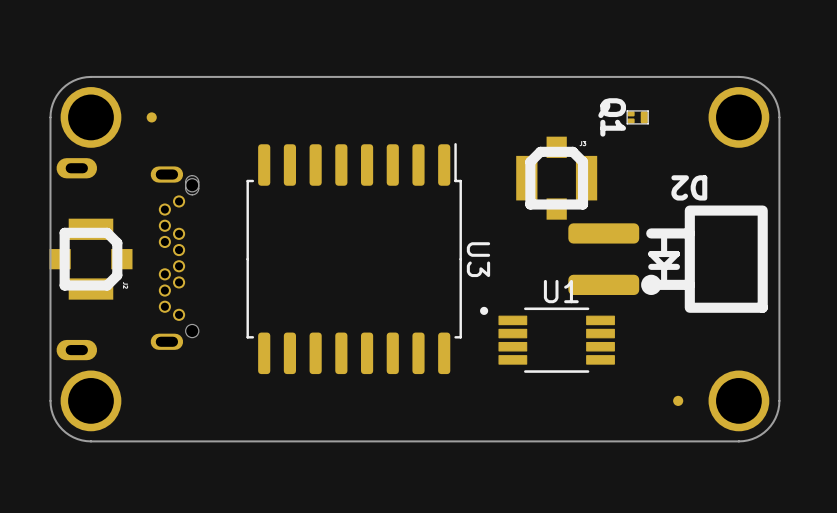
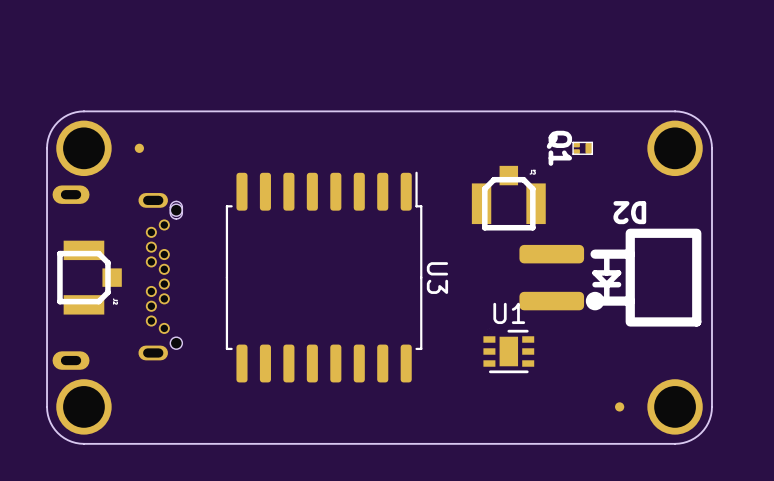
part footprint: [516, 136, 598, 220] -> [471, 165, 546, 231]
part footprint: [49, 218, 133, 300] -> [57, 240, 122, 315]
U1 footprint: [480, 306, 615, 373] -> [483, 328, 535, 374]

